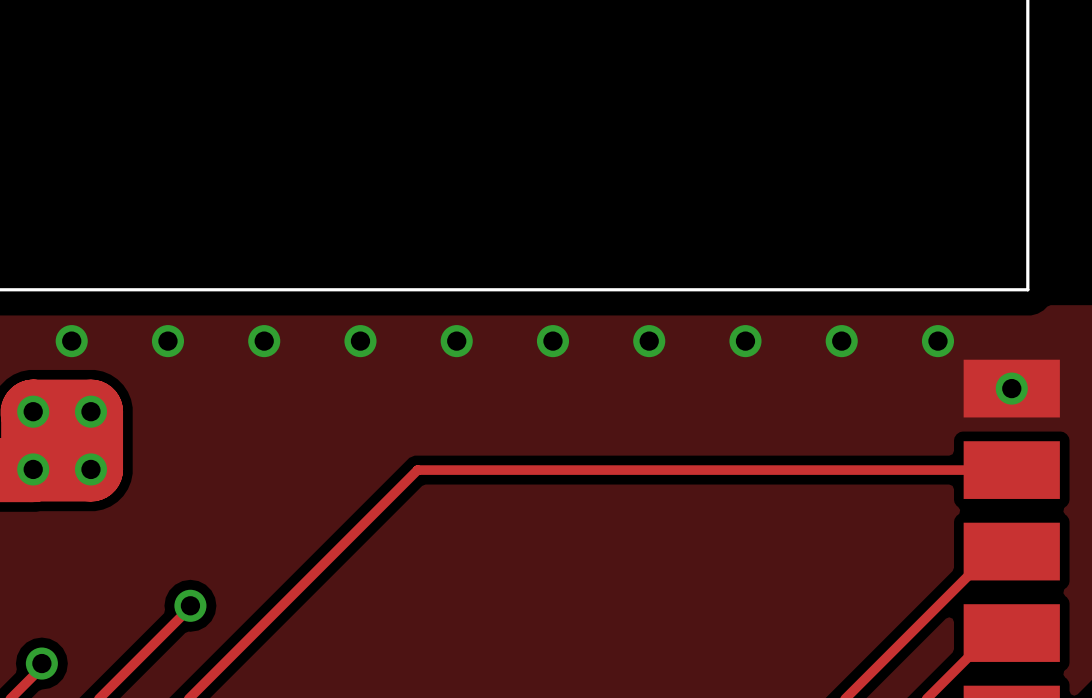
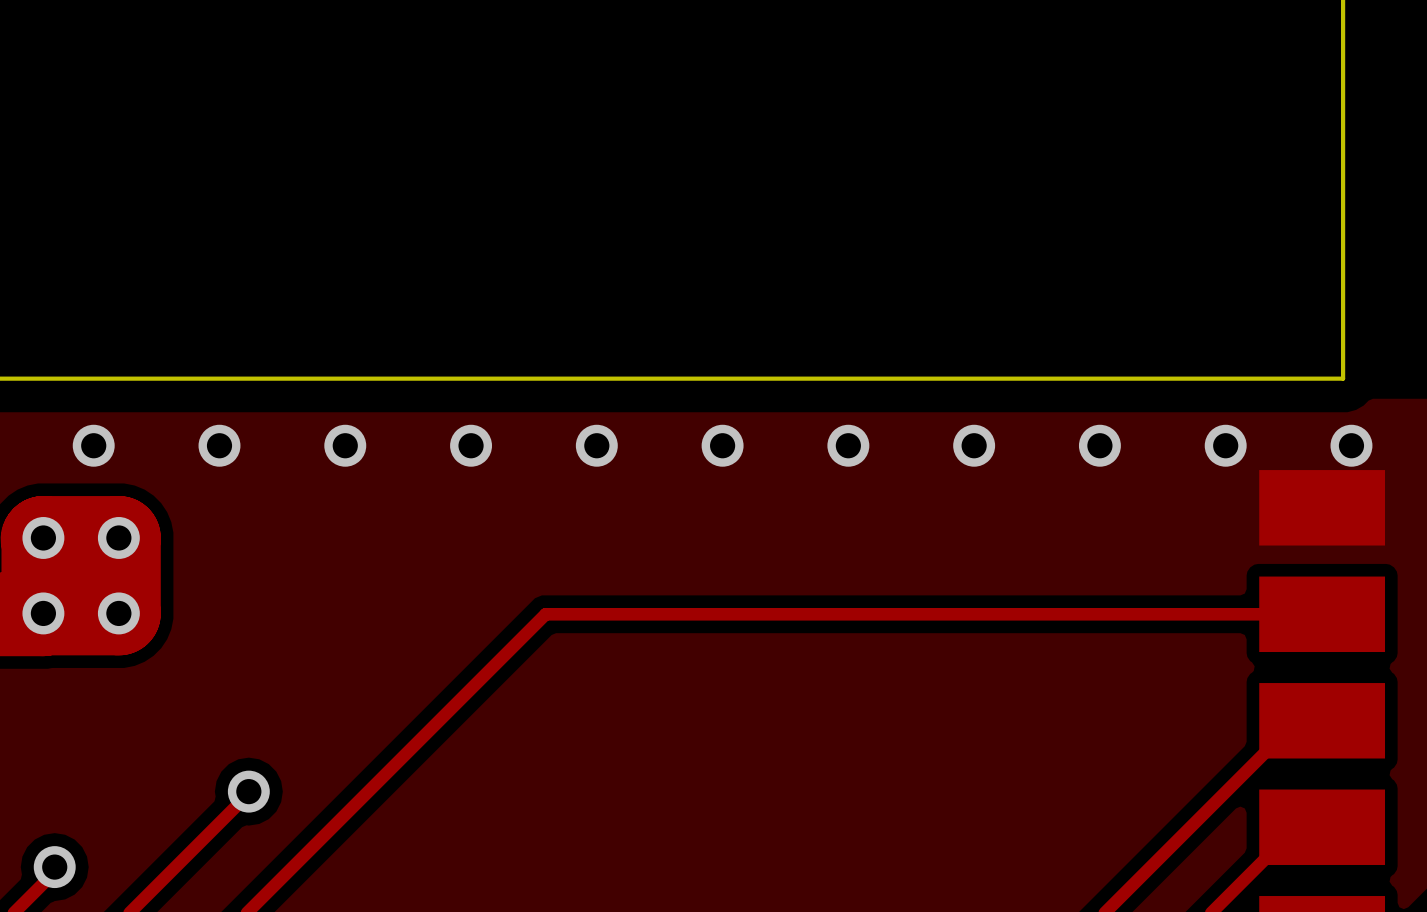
via position: (1011, 388) -> (1351, 445)

